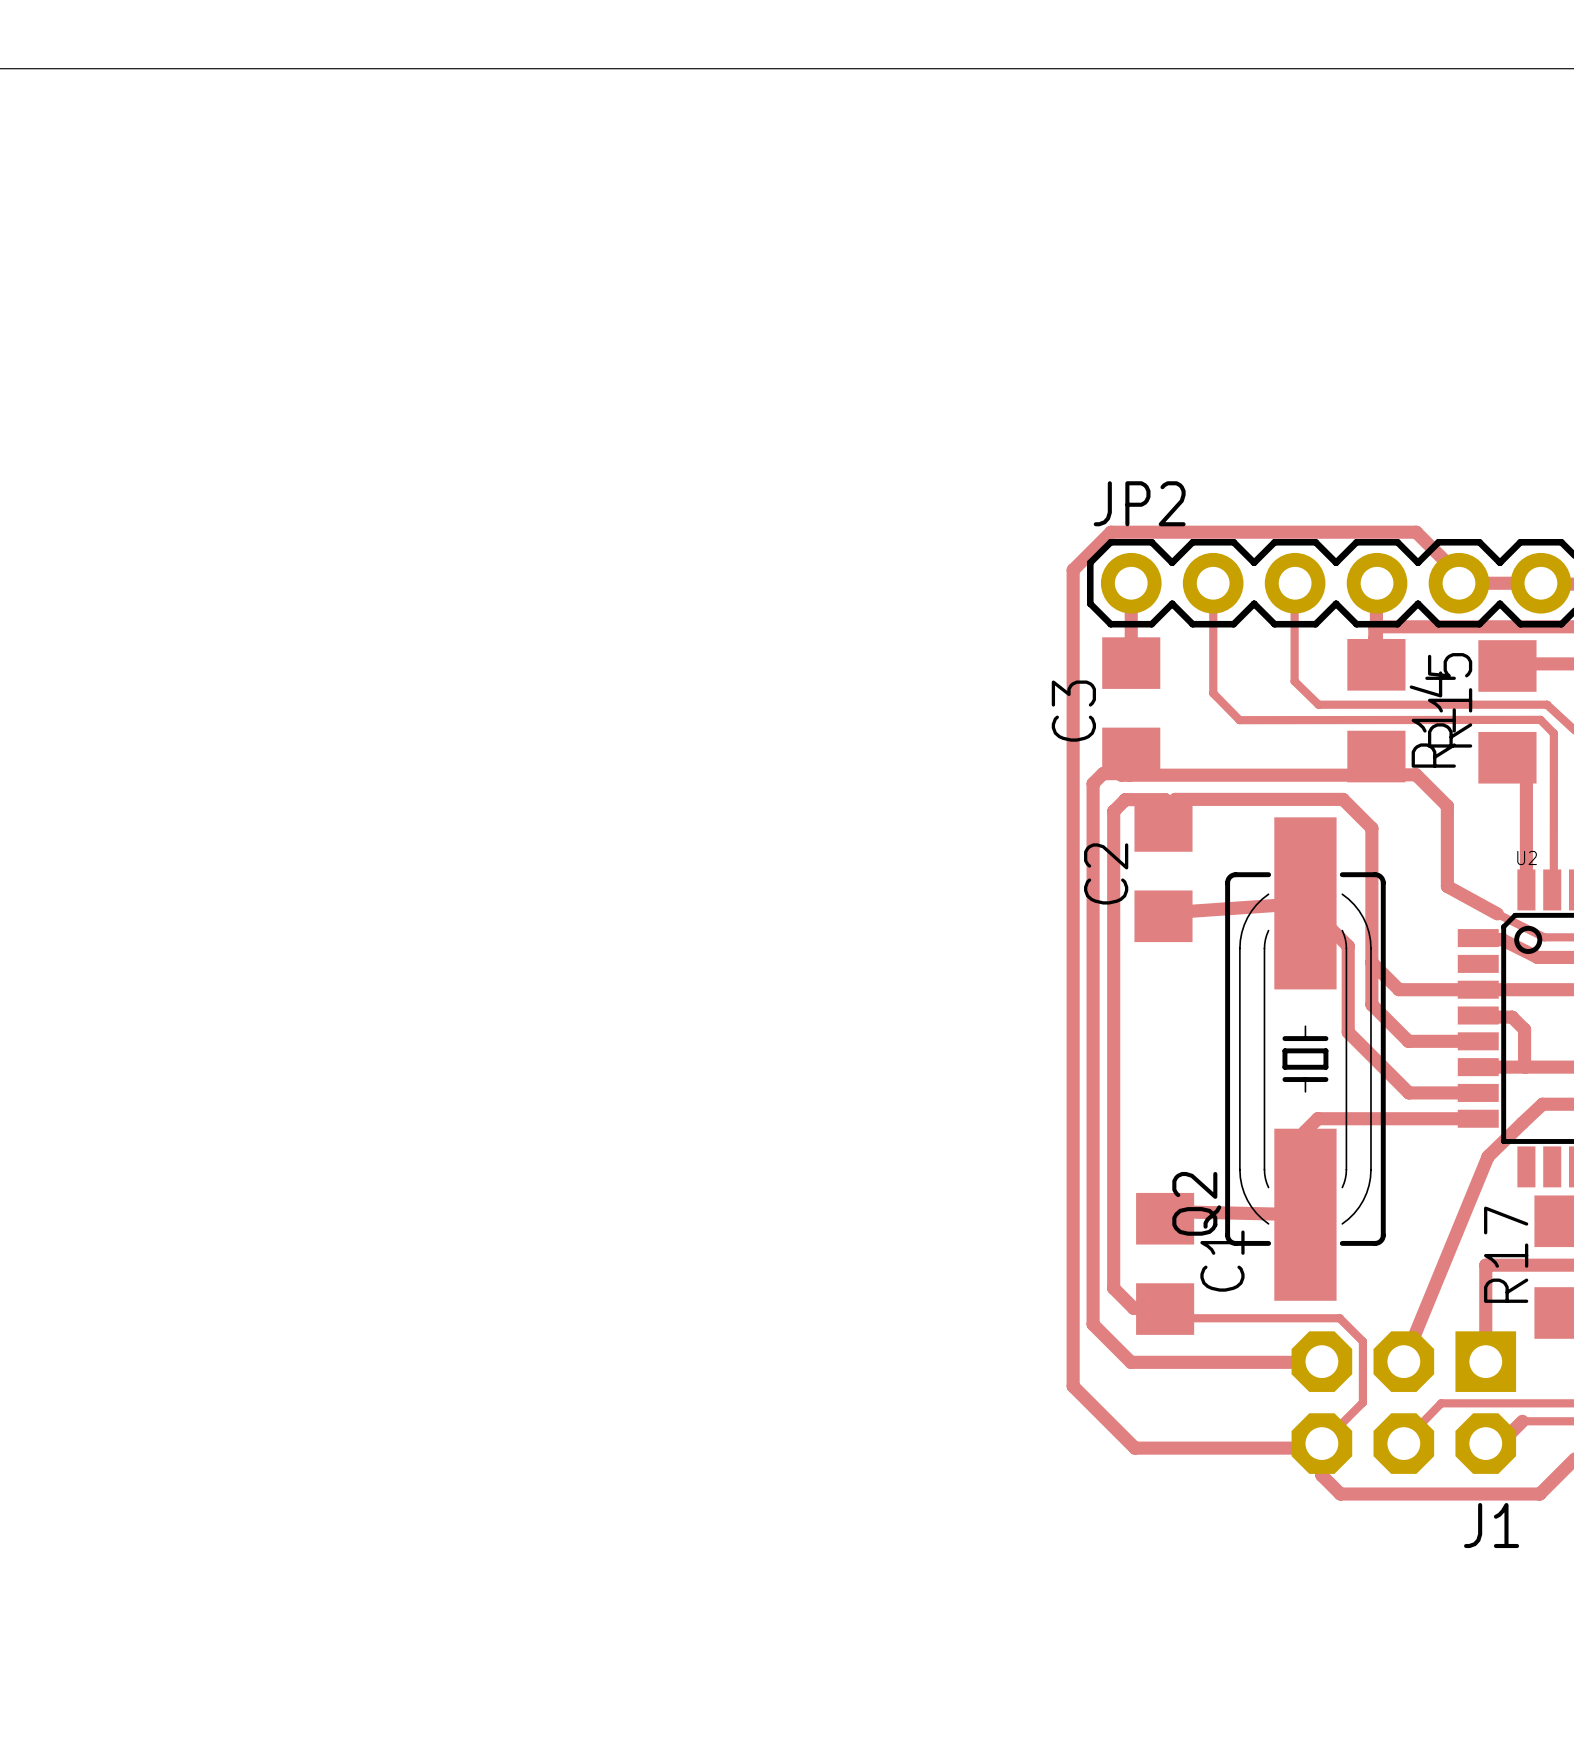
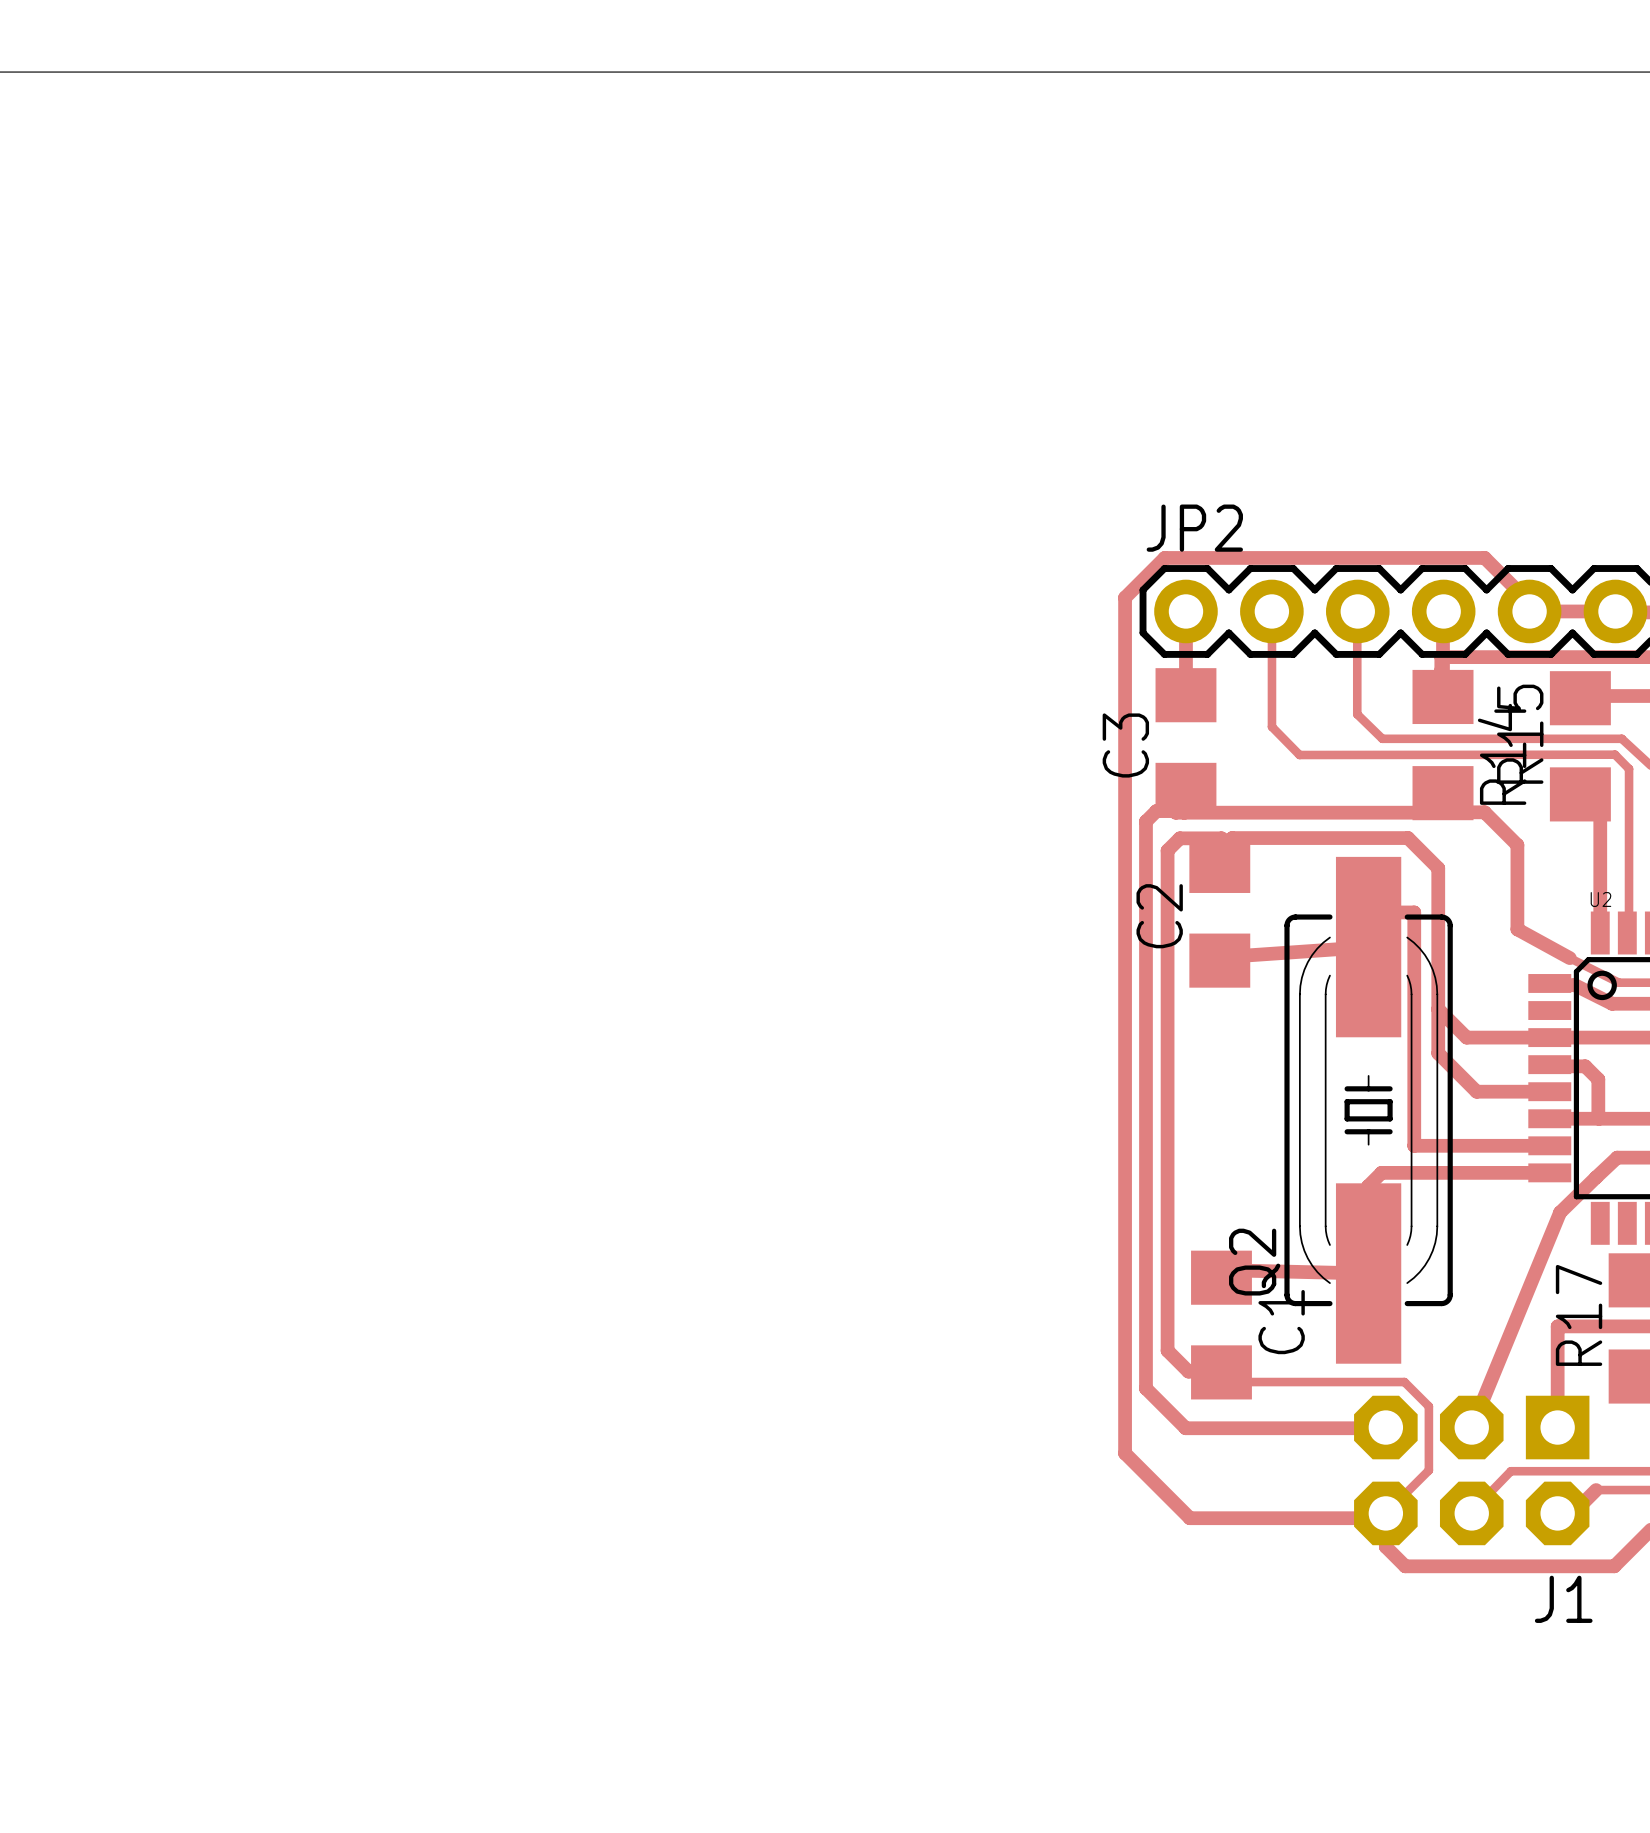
track: (1305, 903) (1348, 946) (1348, 1032) (1408, 1092) -> (1368, 912) (1414, 912) (1414, 1145) (1477, 1145)

